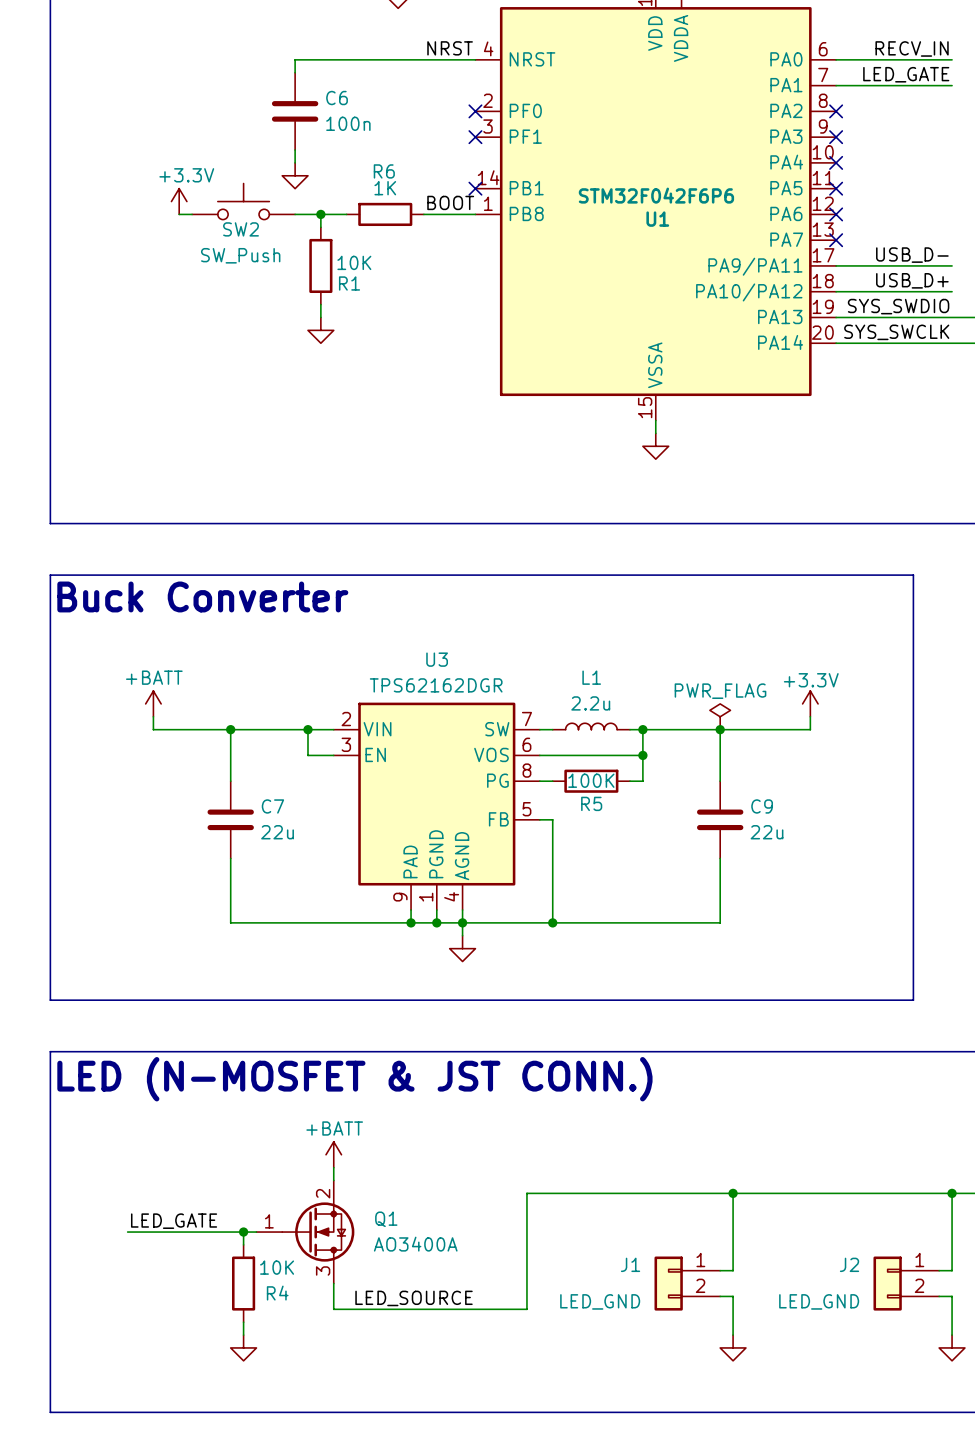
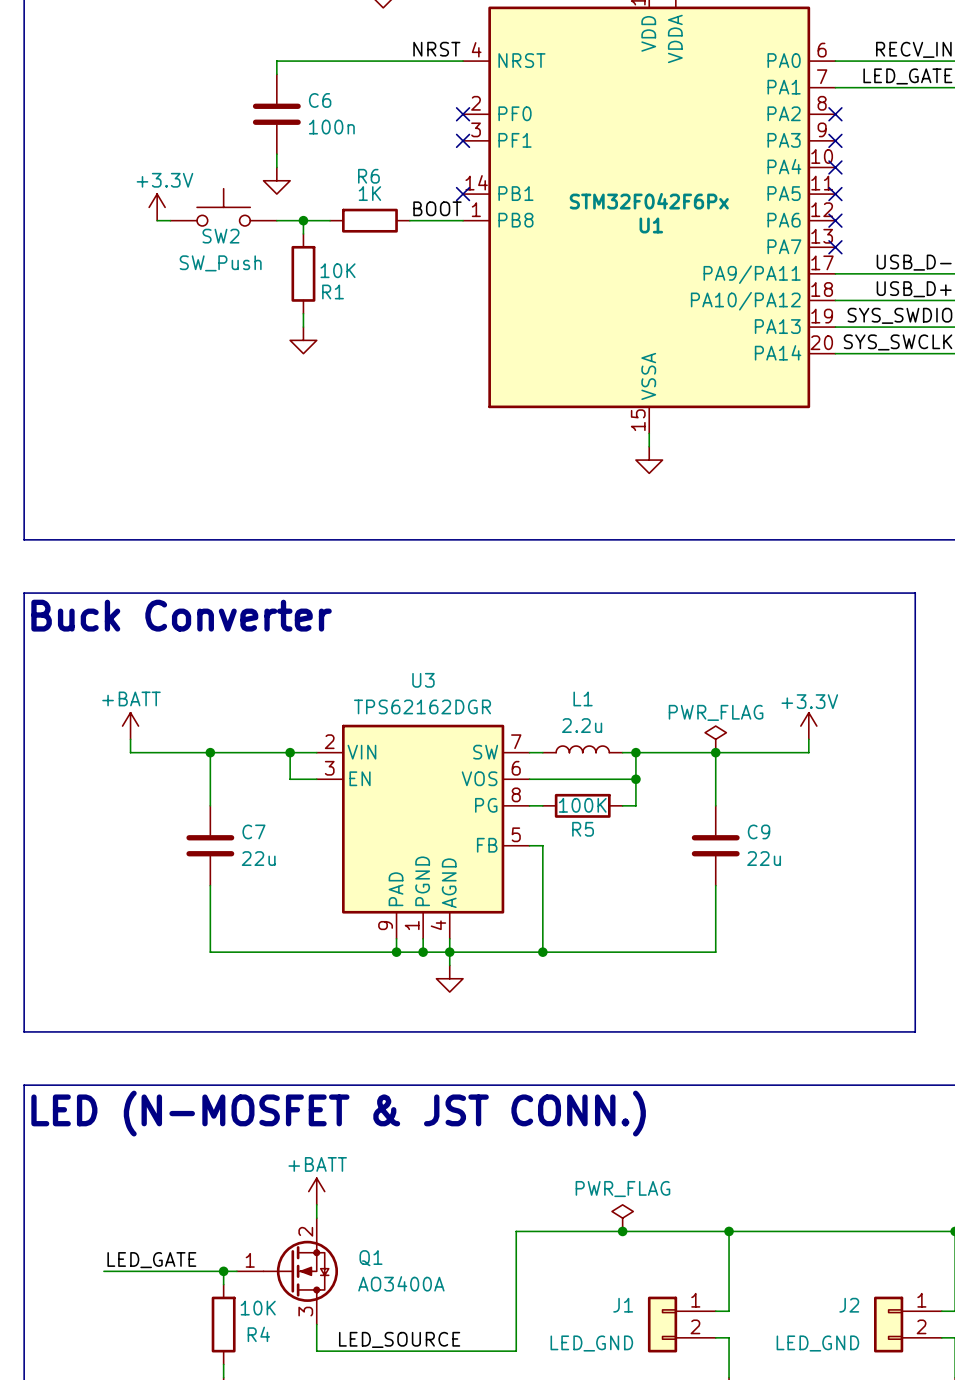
U1 value: STM32F042F6P6 (656, 195) -> STM32F042F6Px (649, 201)
power symbol: none -> PWR_FLAG (622, 1218)
junction: none -> (622, 1231)

